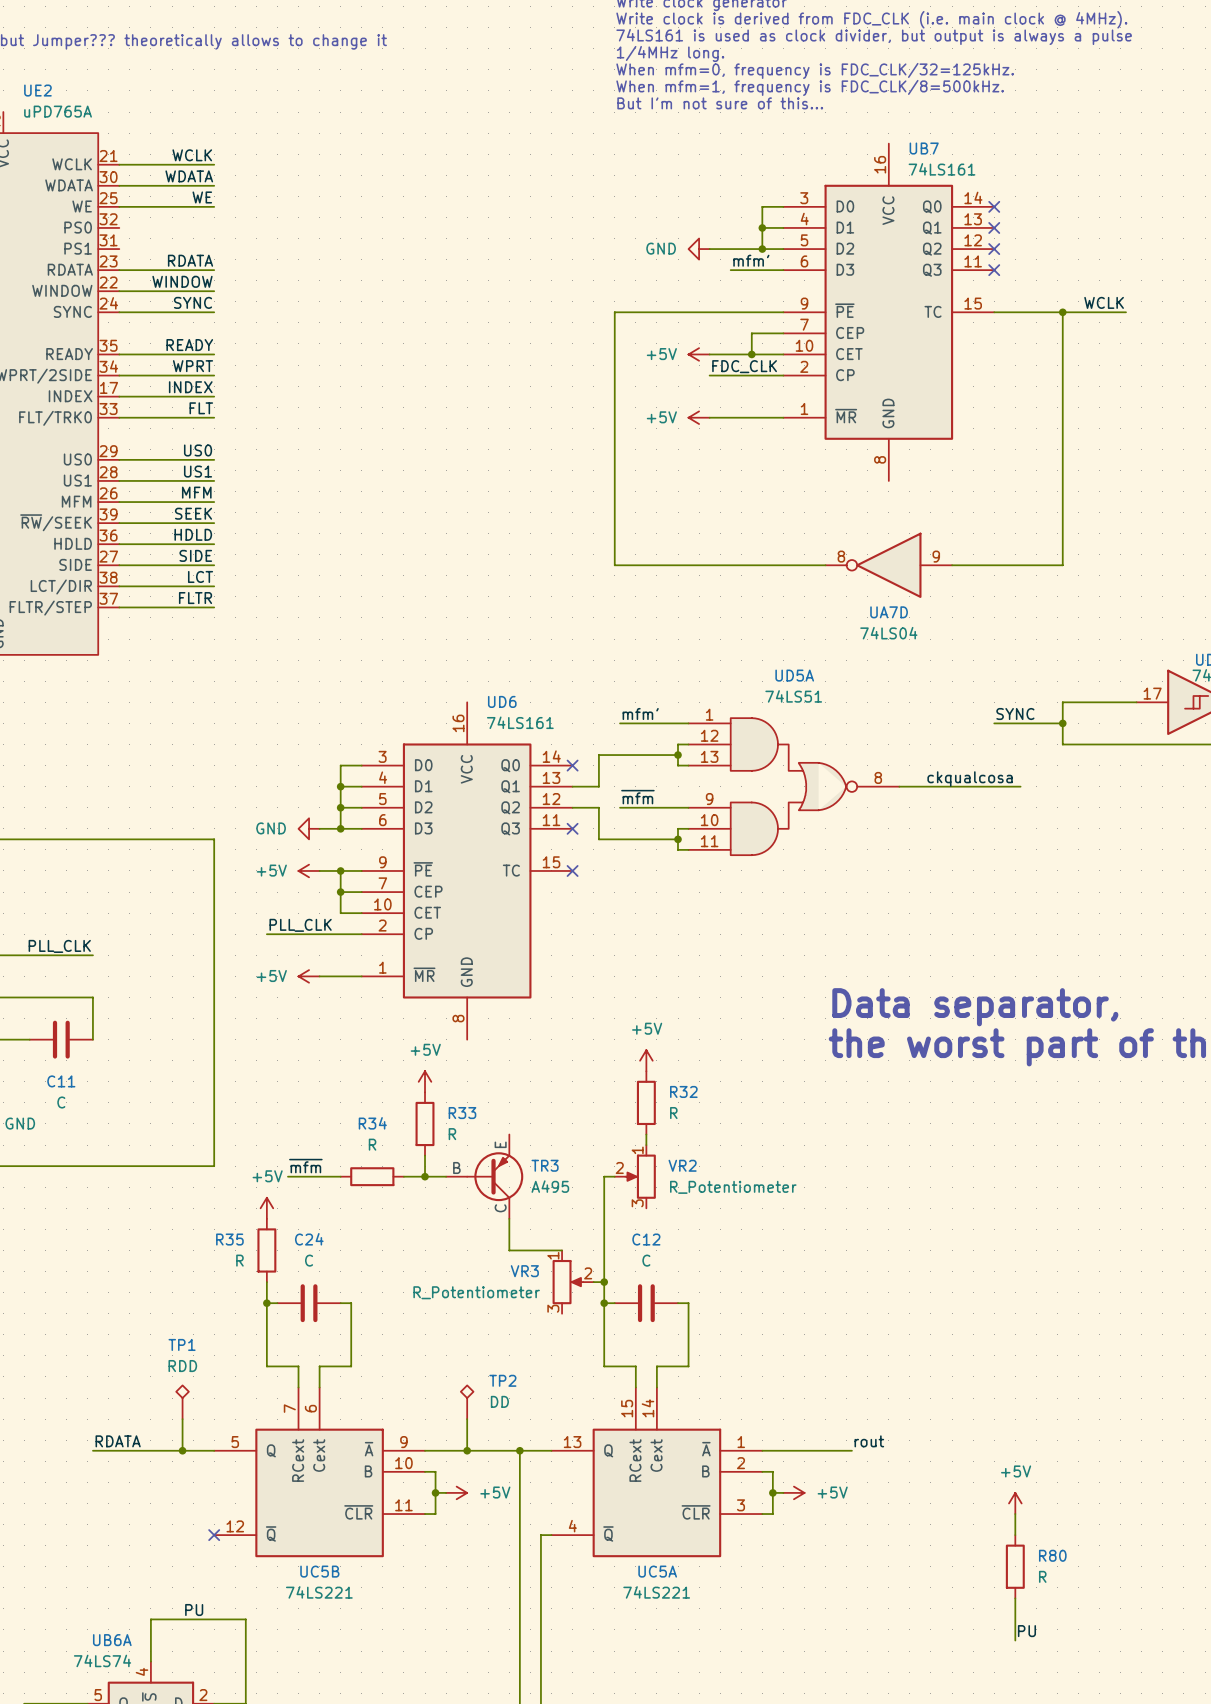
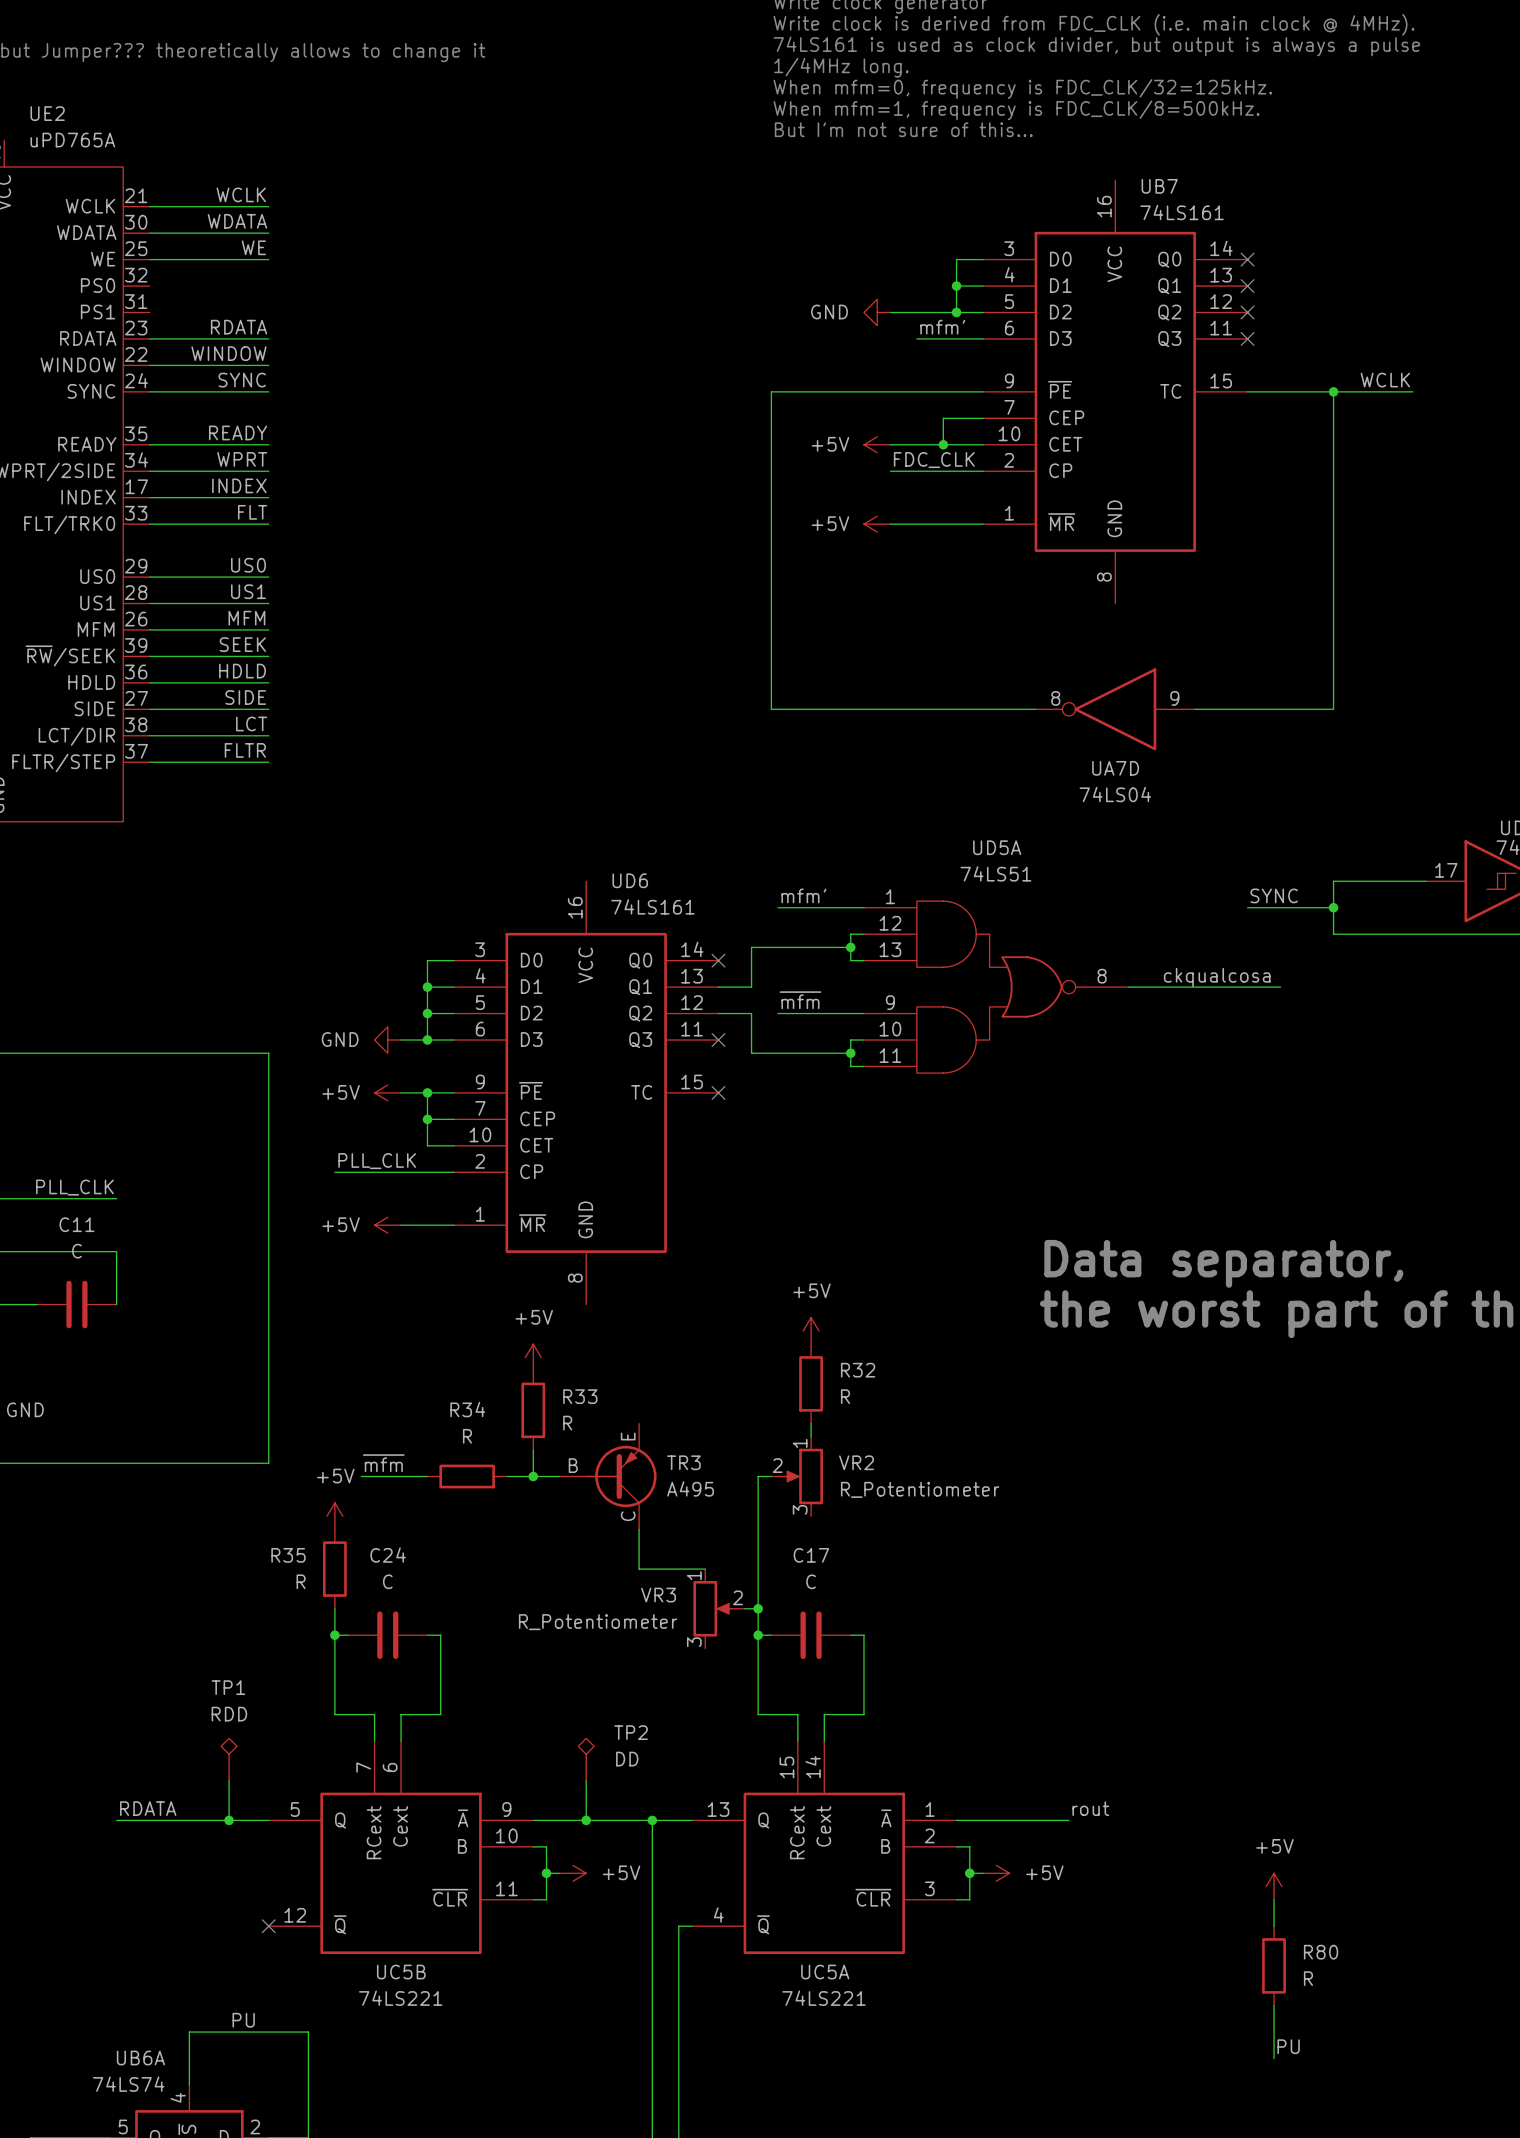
C11 name position: C11 (61, 1081) -> C11 (76, 1224)
C11 value position: C (61, 1102) -> C (76, 1251)
C12 name: C12 (646, 1239) -> C17 (811, 1555)

